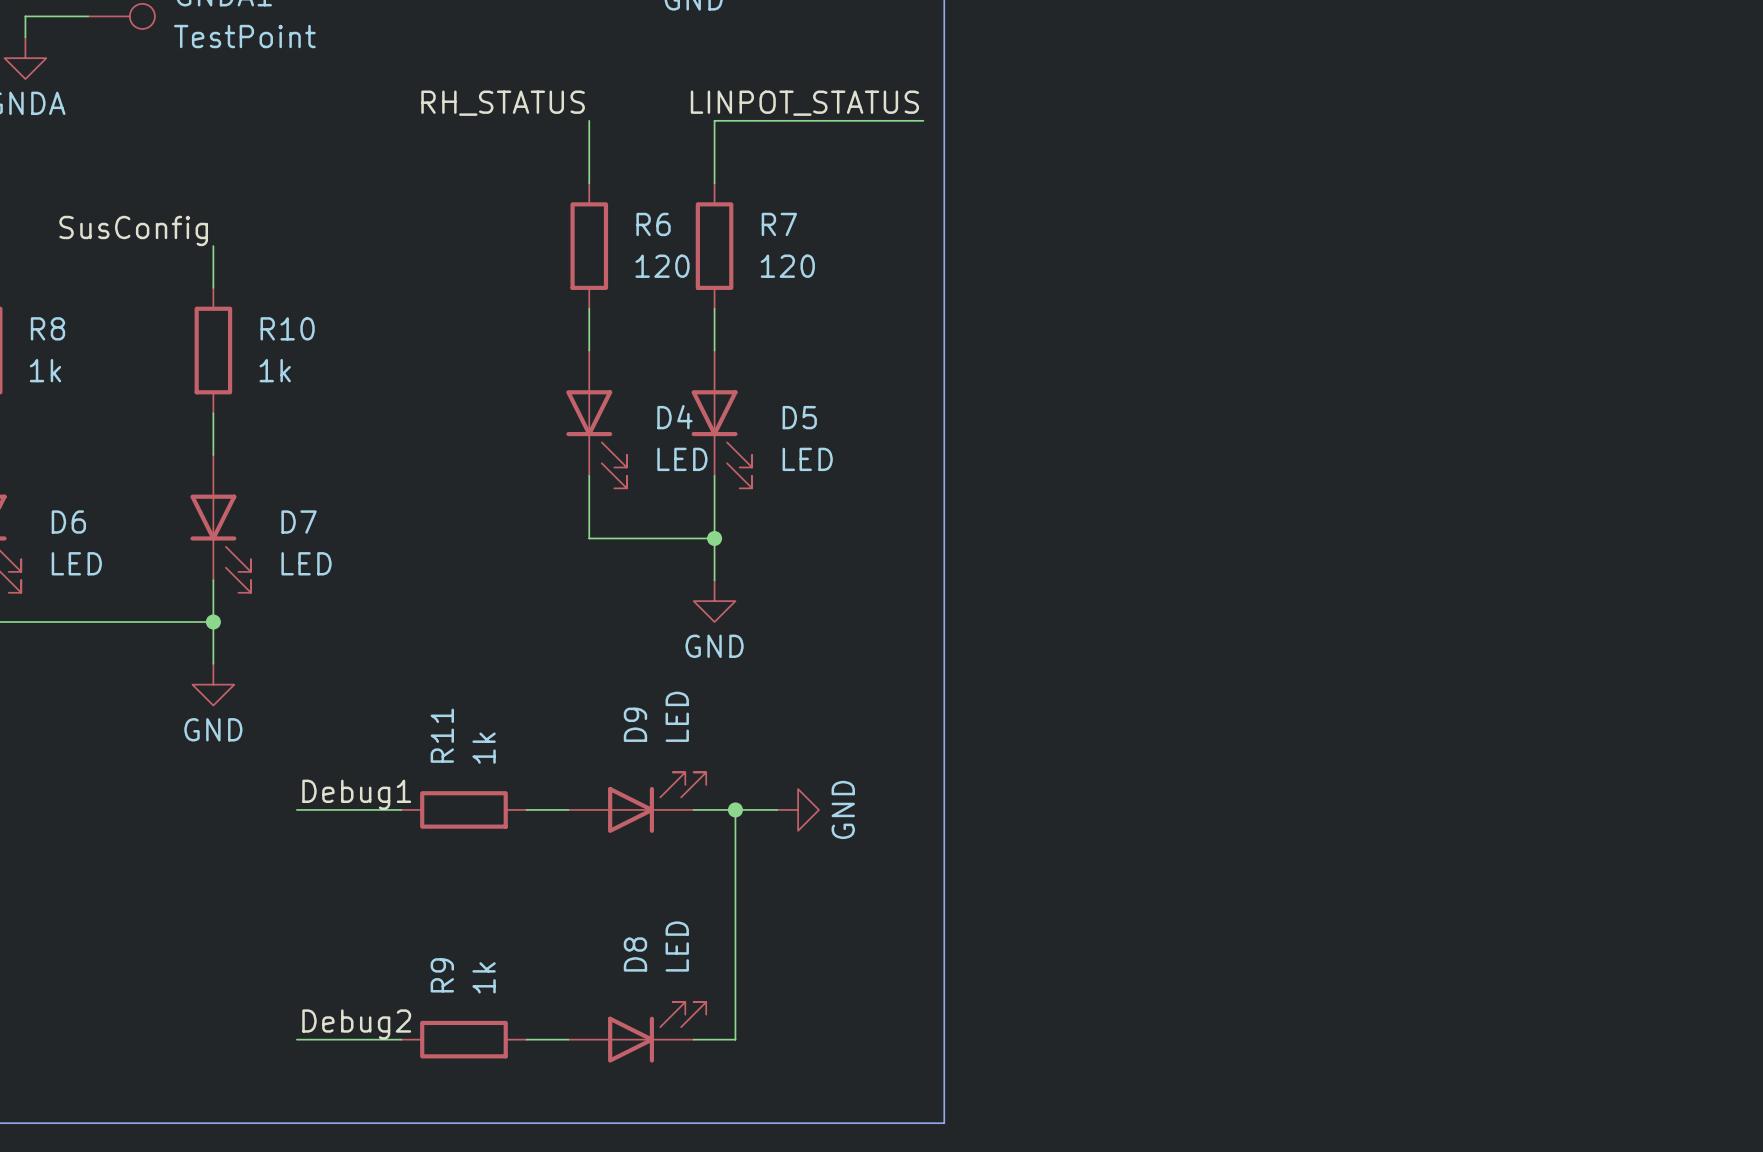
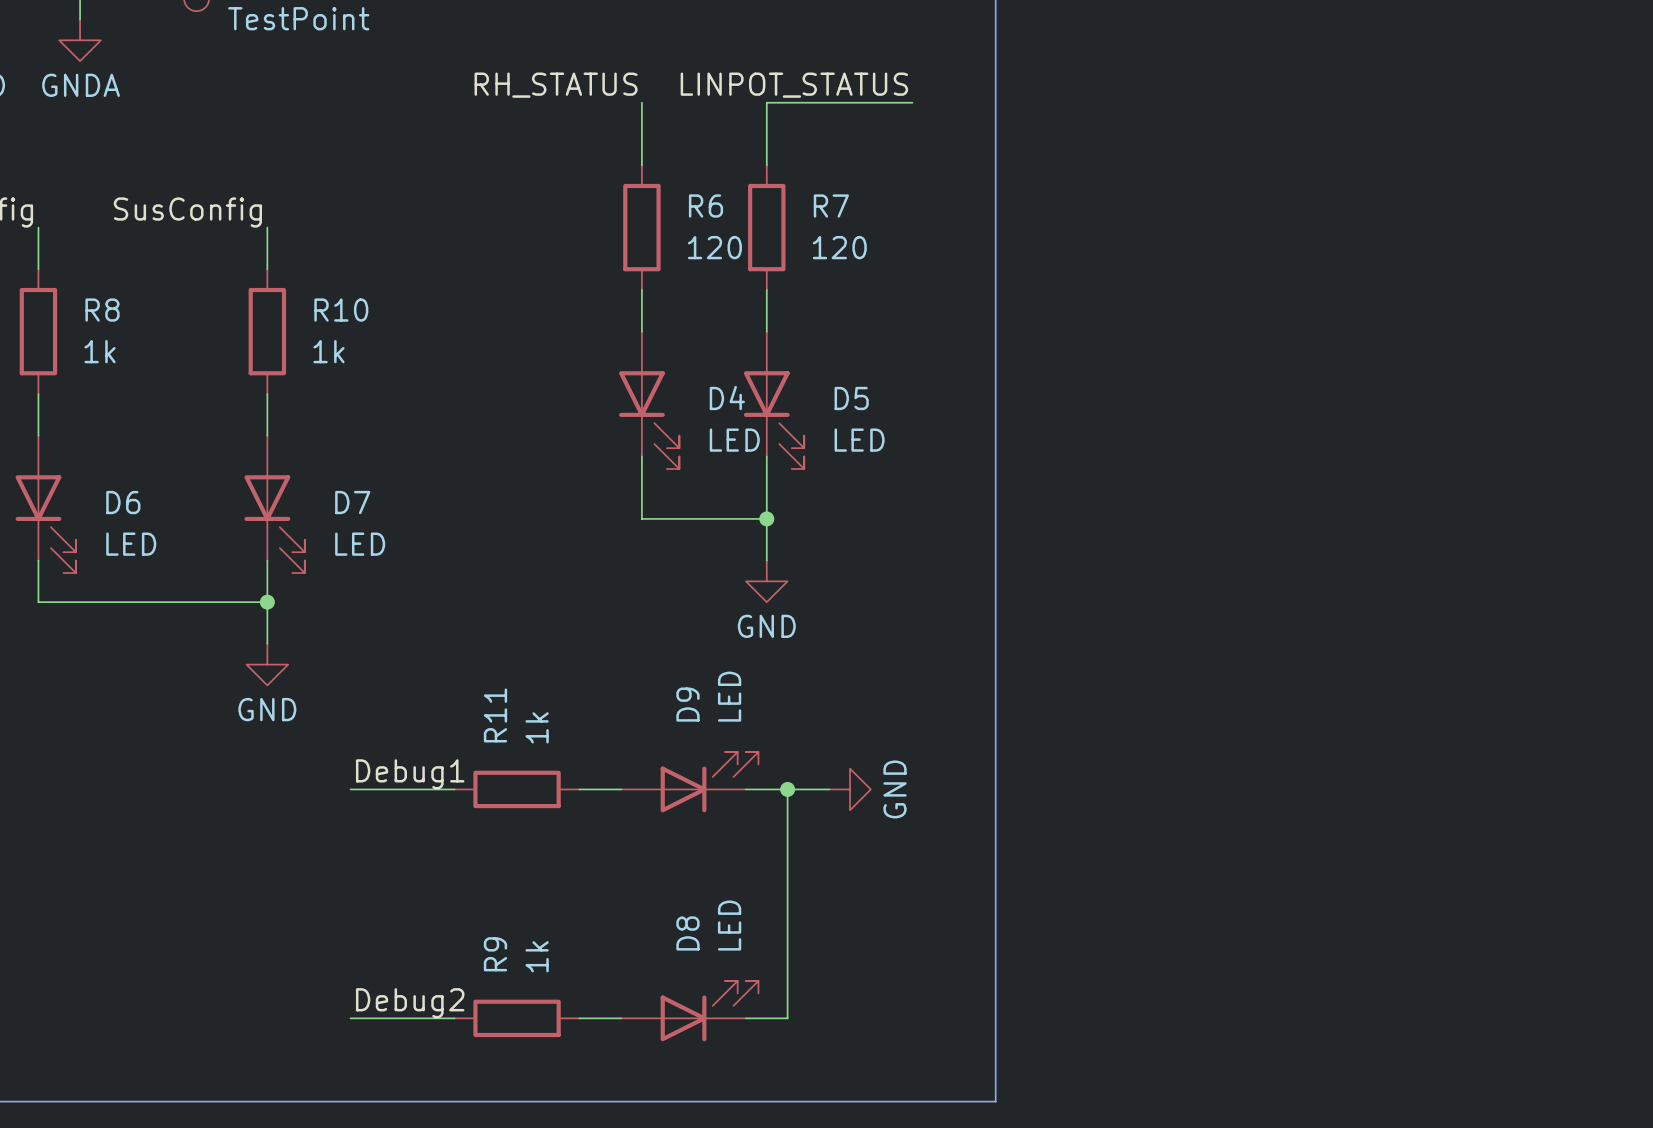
label position: LINPOT_STATUS (804, 103) -> LINPOT_STATUS (794, 85)
wire: (860, 120) (923, 120) -> none

